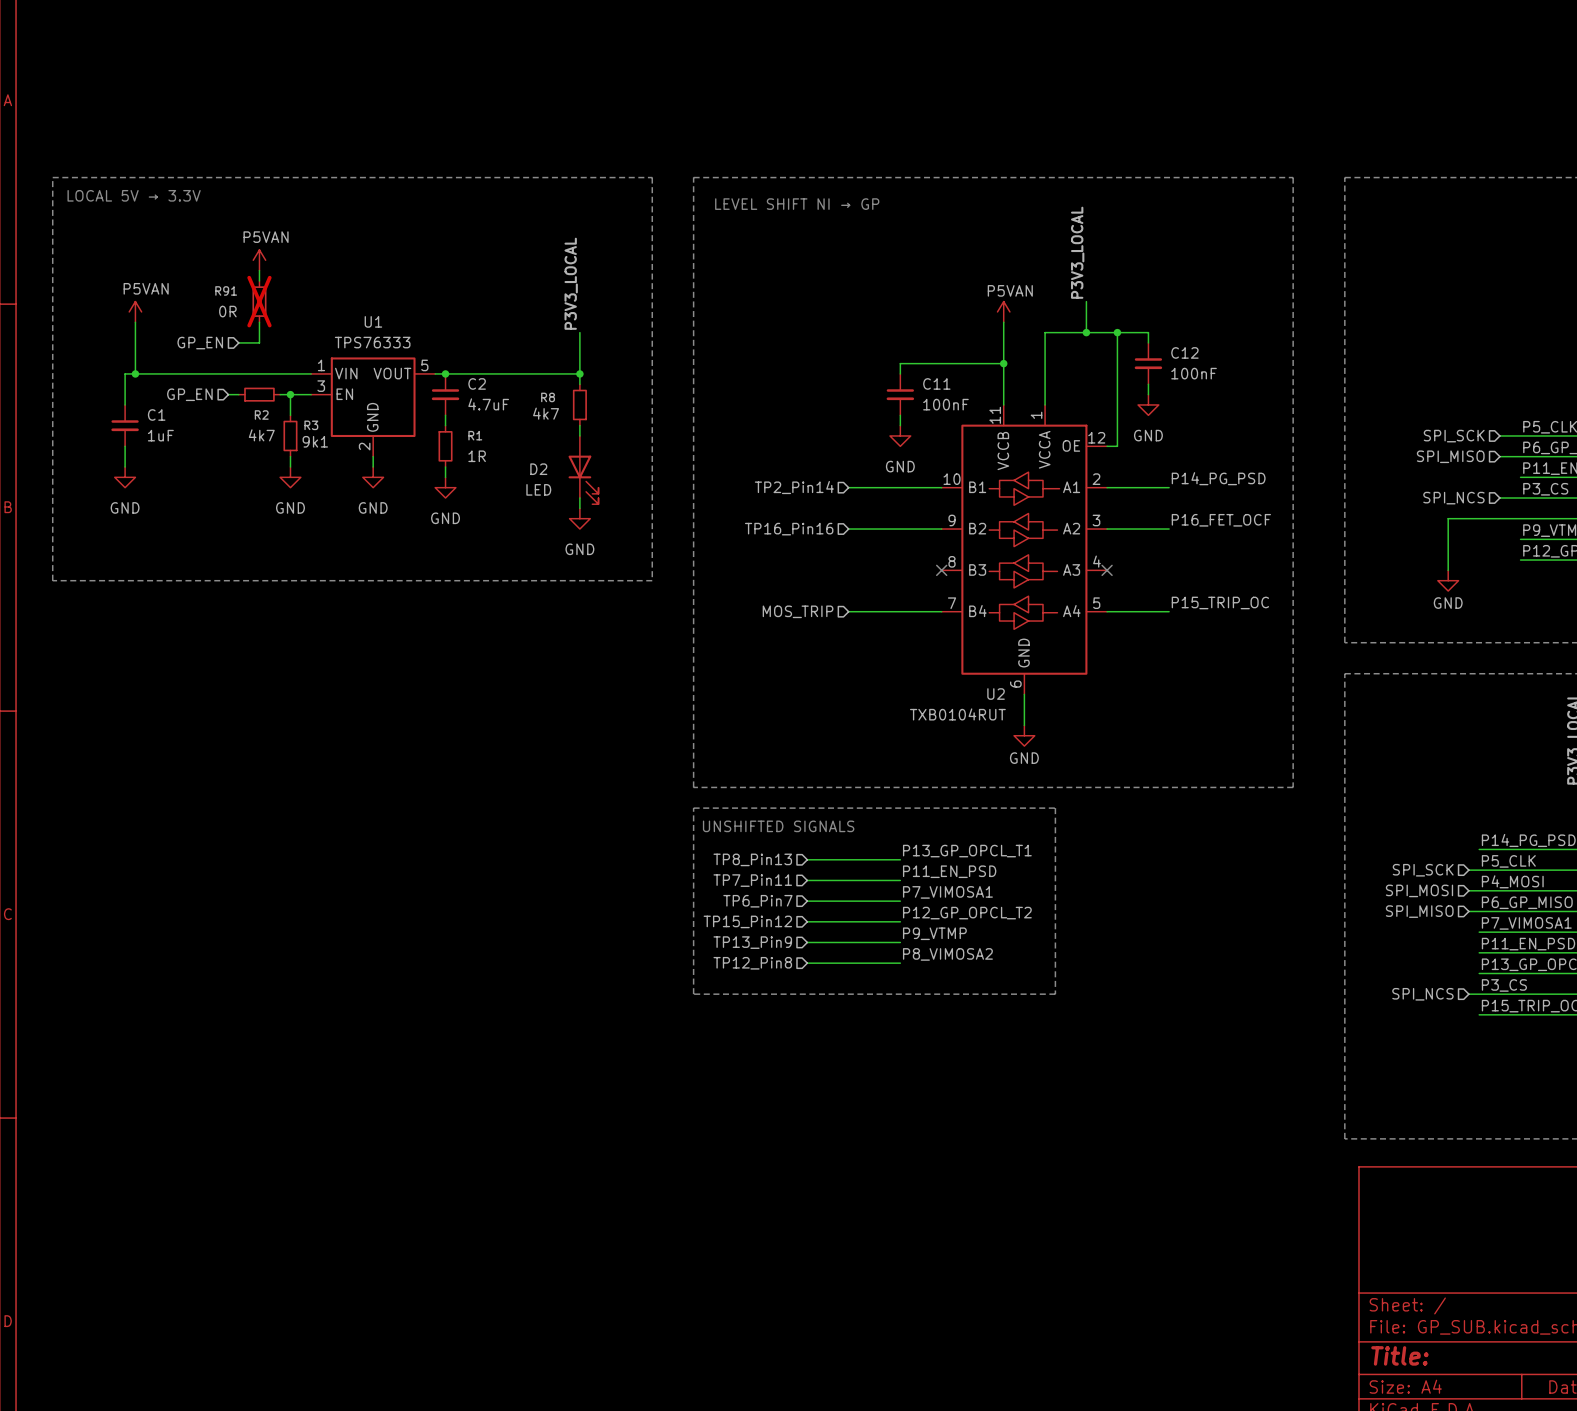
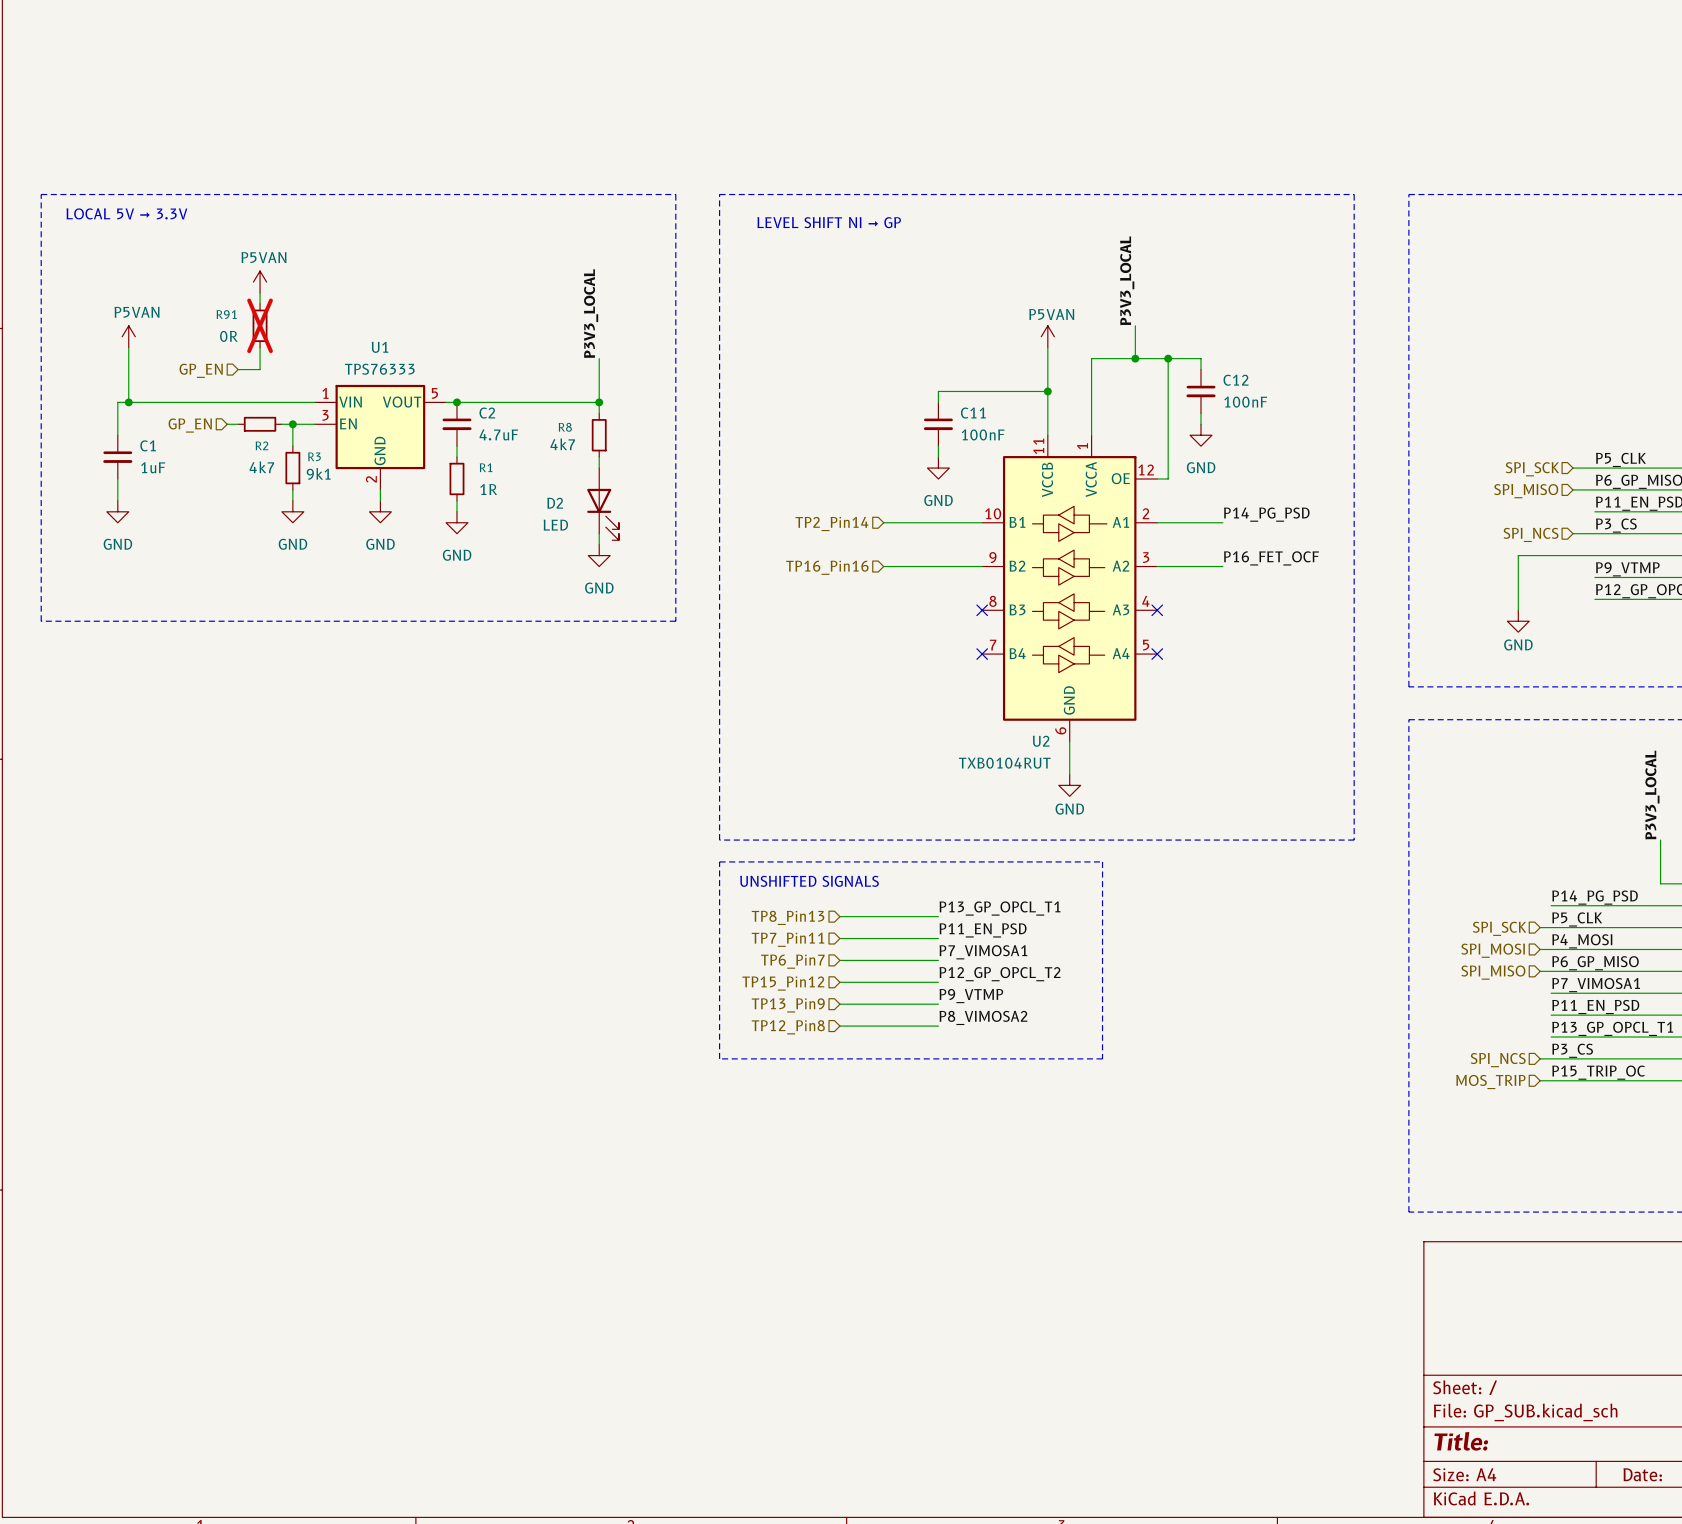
label: P15_TRIP_OC (1220, 602) -> none
hierarchical label: MOS_TRIP (798, 611) -> none
wire: (848, 611) (941, 611) -> none
no-connect mark: none -> (982, 654)
wire: (1107, 611) (1169, 611) -> none
no-connect mark: none -> (1157, 654)
hierarchical label: none -> MOS_TRIP (1490, 1082)
wire: none -> (1540, 1080) (1551, 1080)

